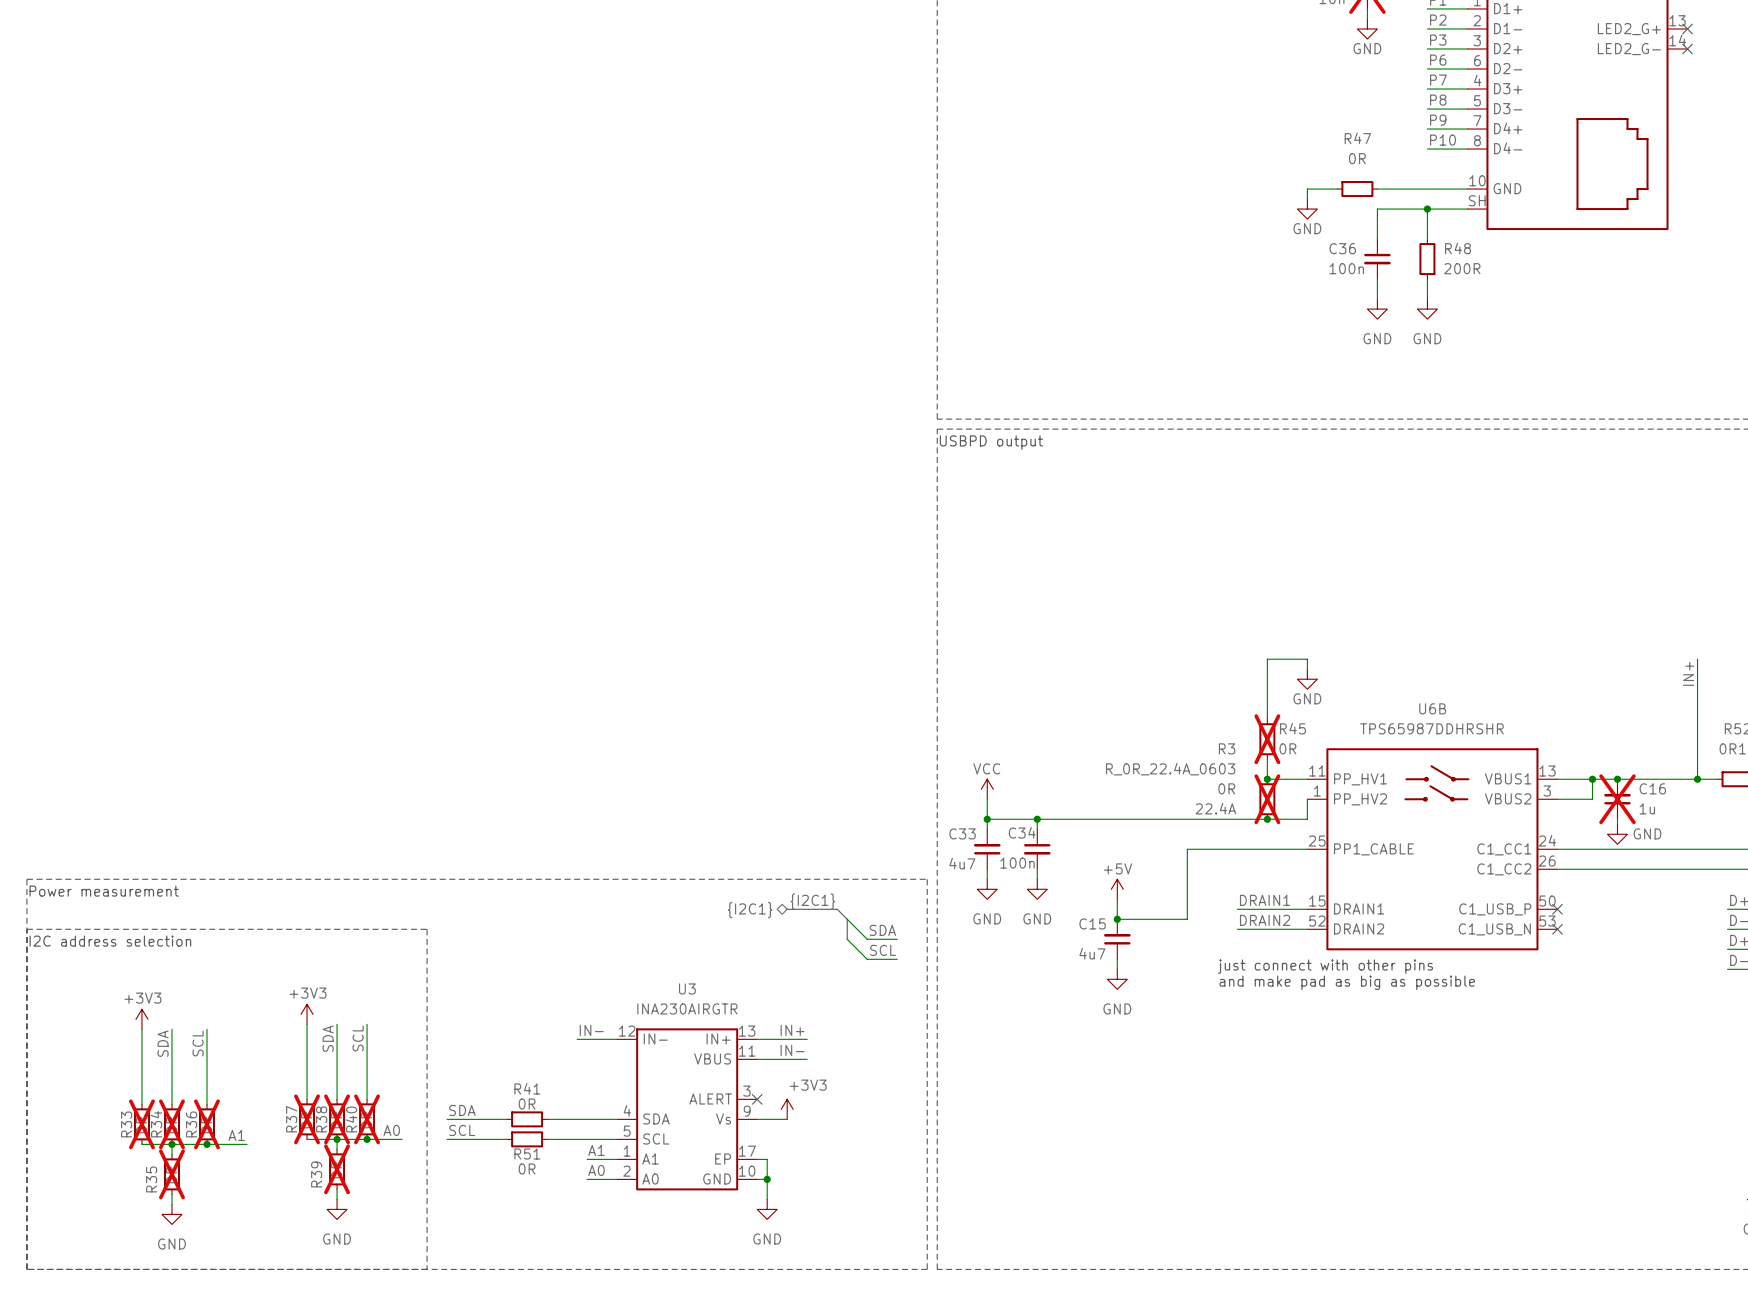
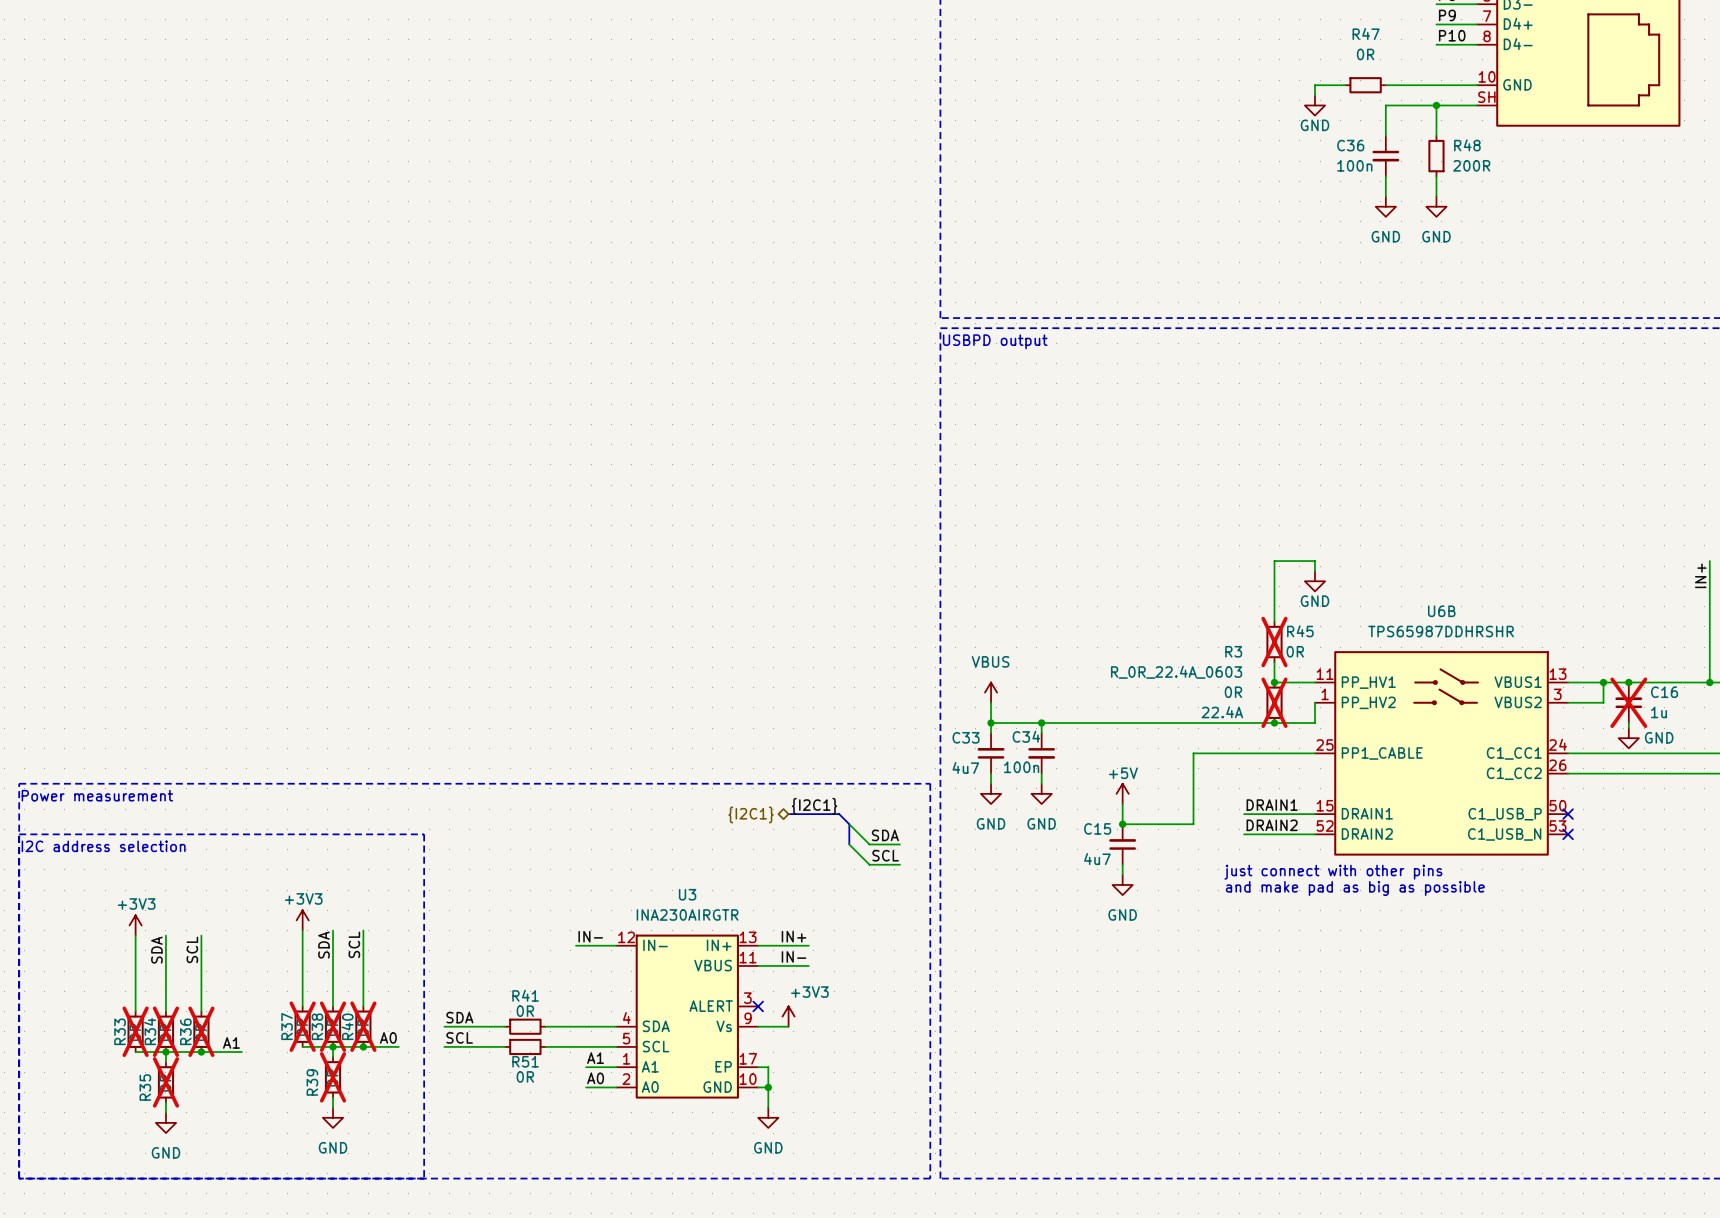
power symbol: VCC (987, 789) -> VBUS (991, 692)

